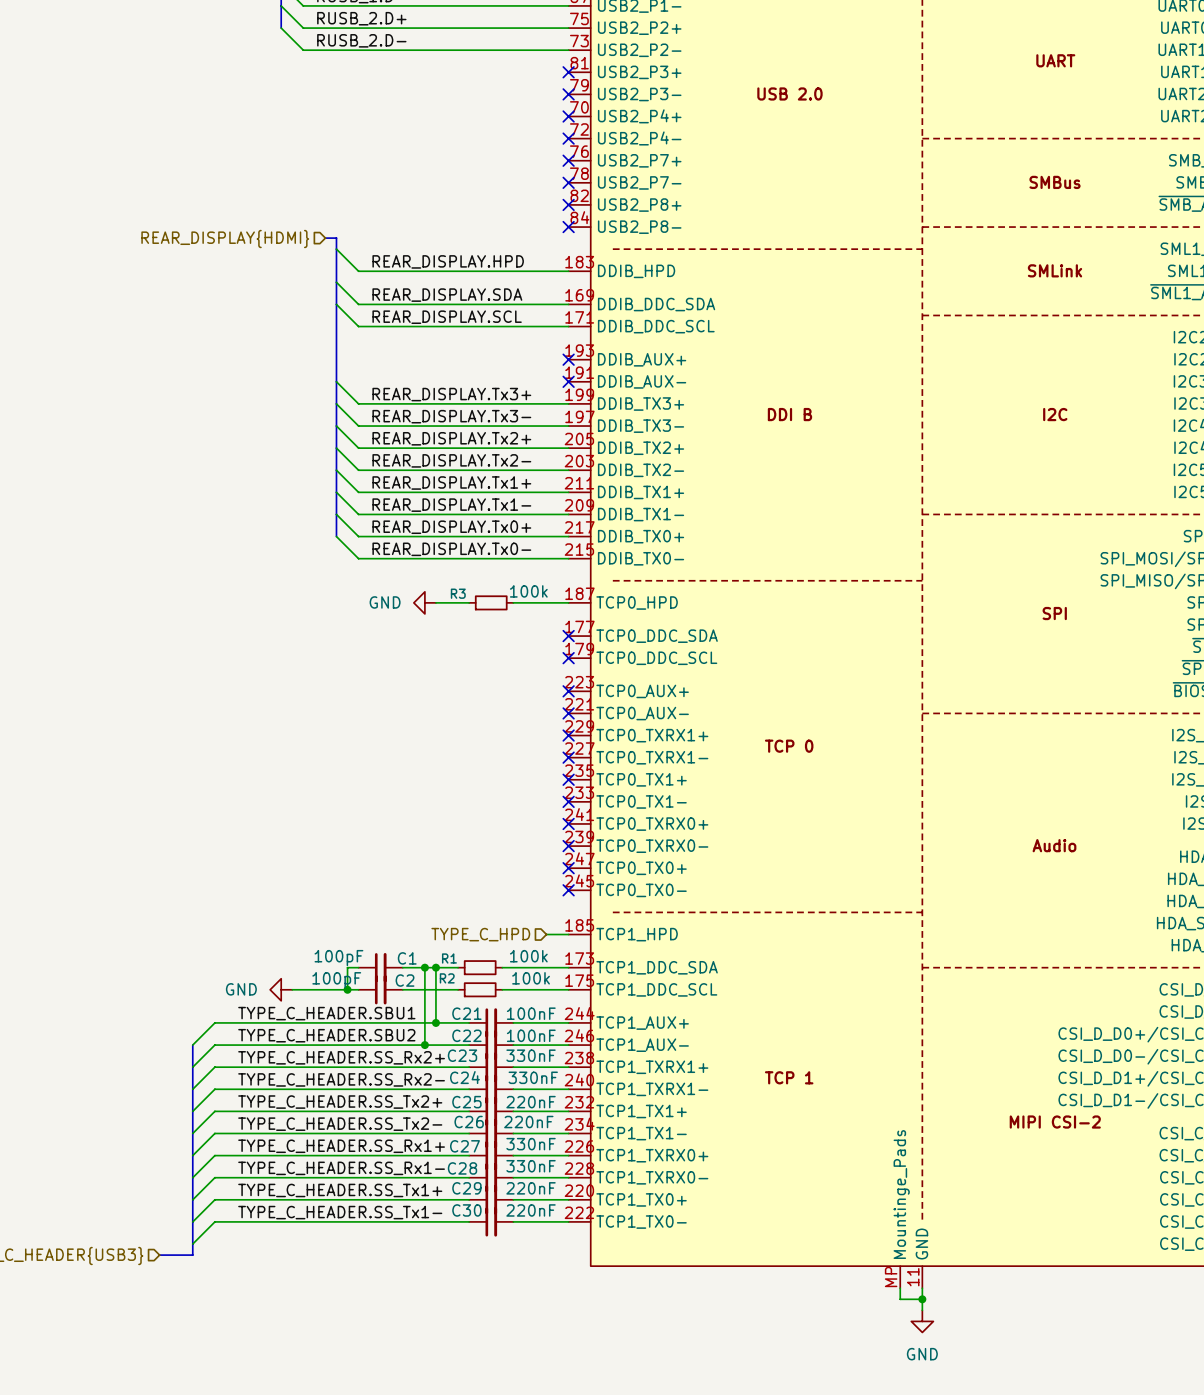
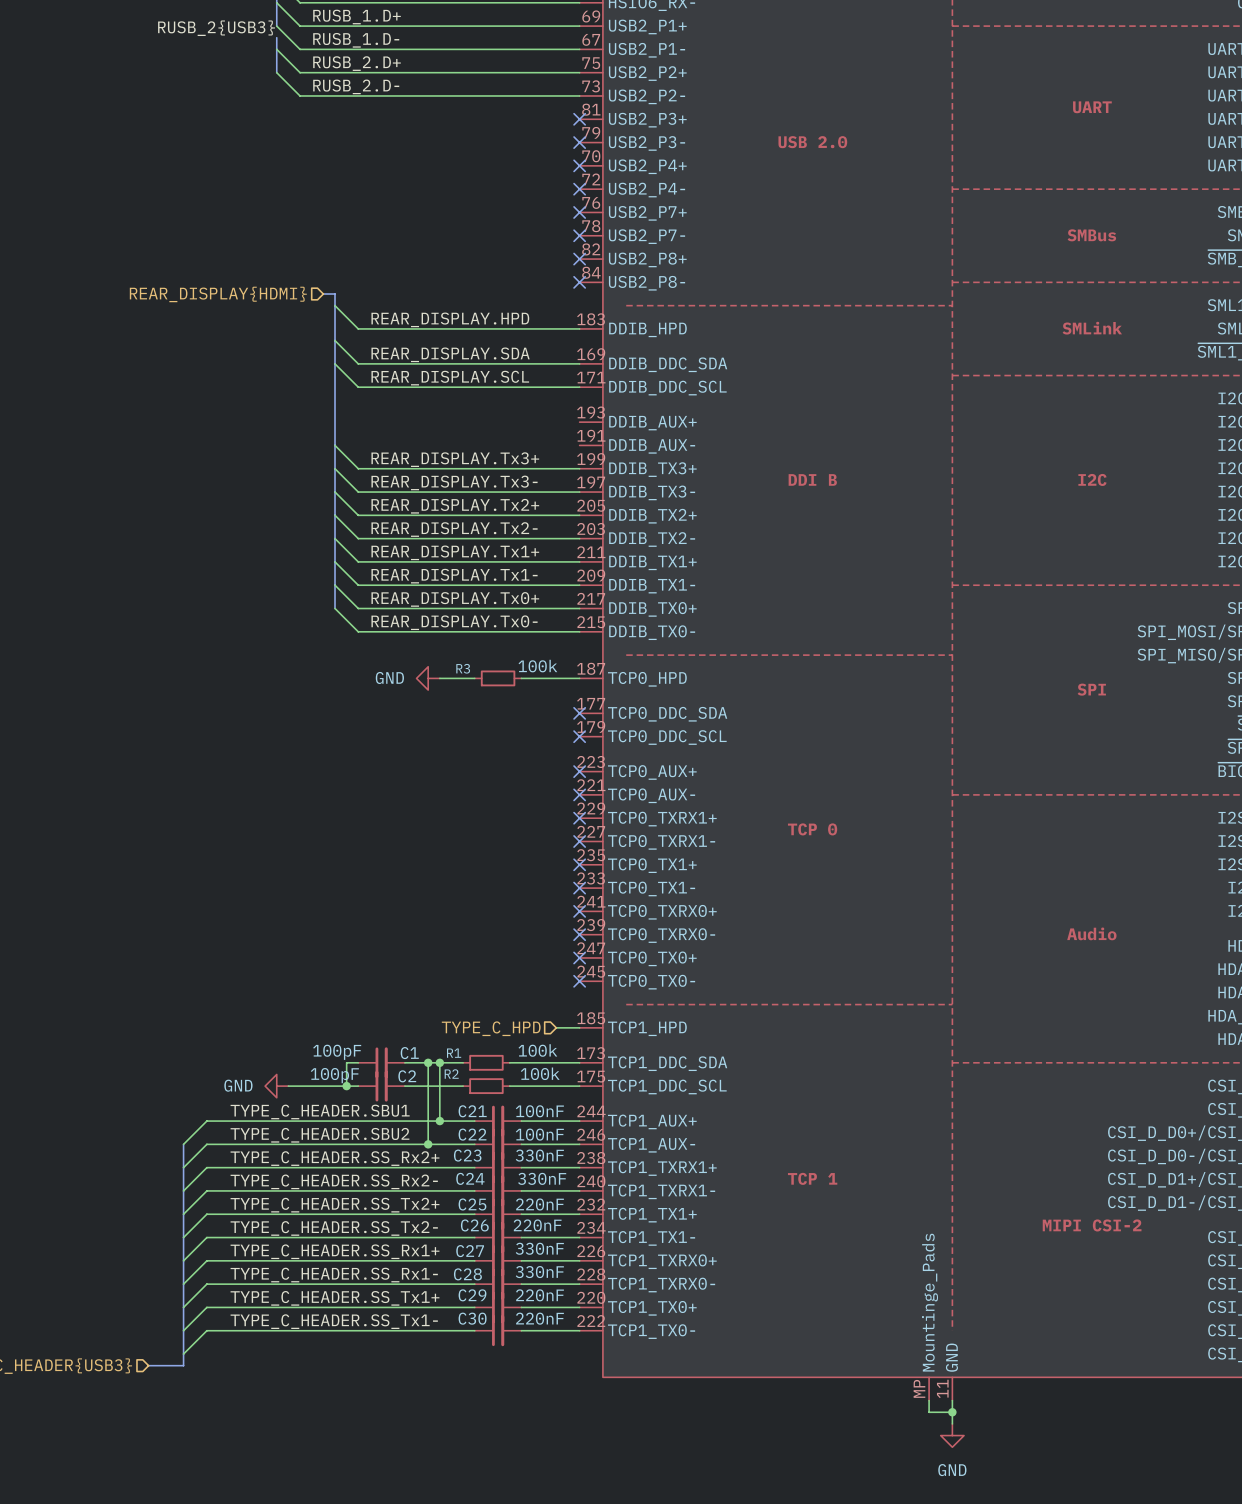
no-connect mark: (568, 359) -> none
no-connect mark: (568, 381) -> none

